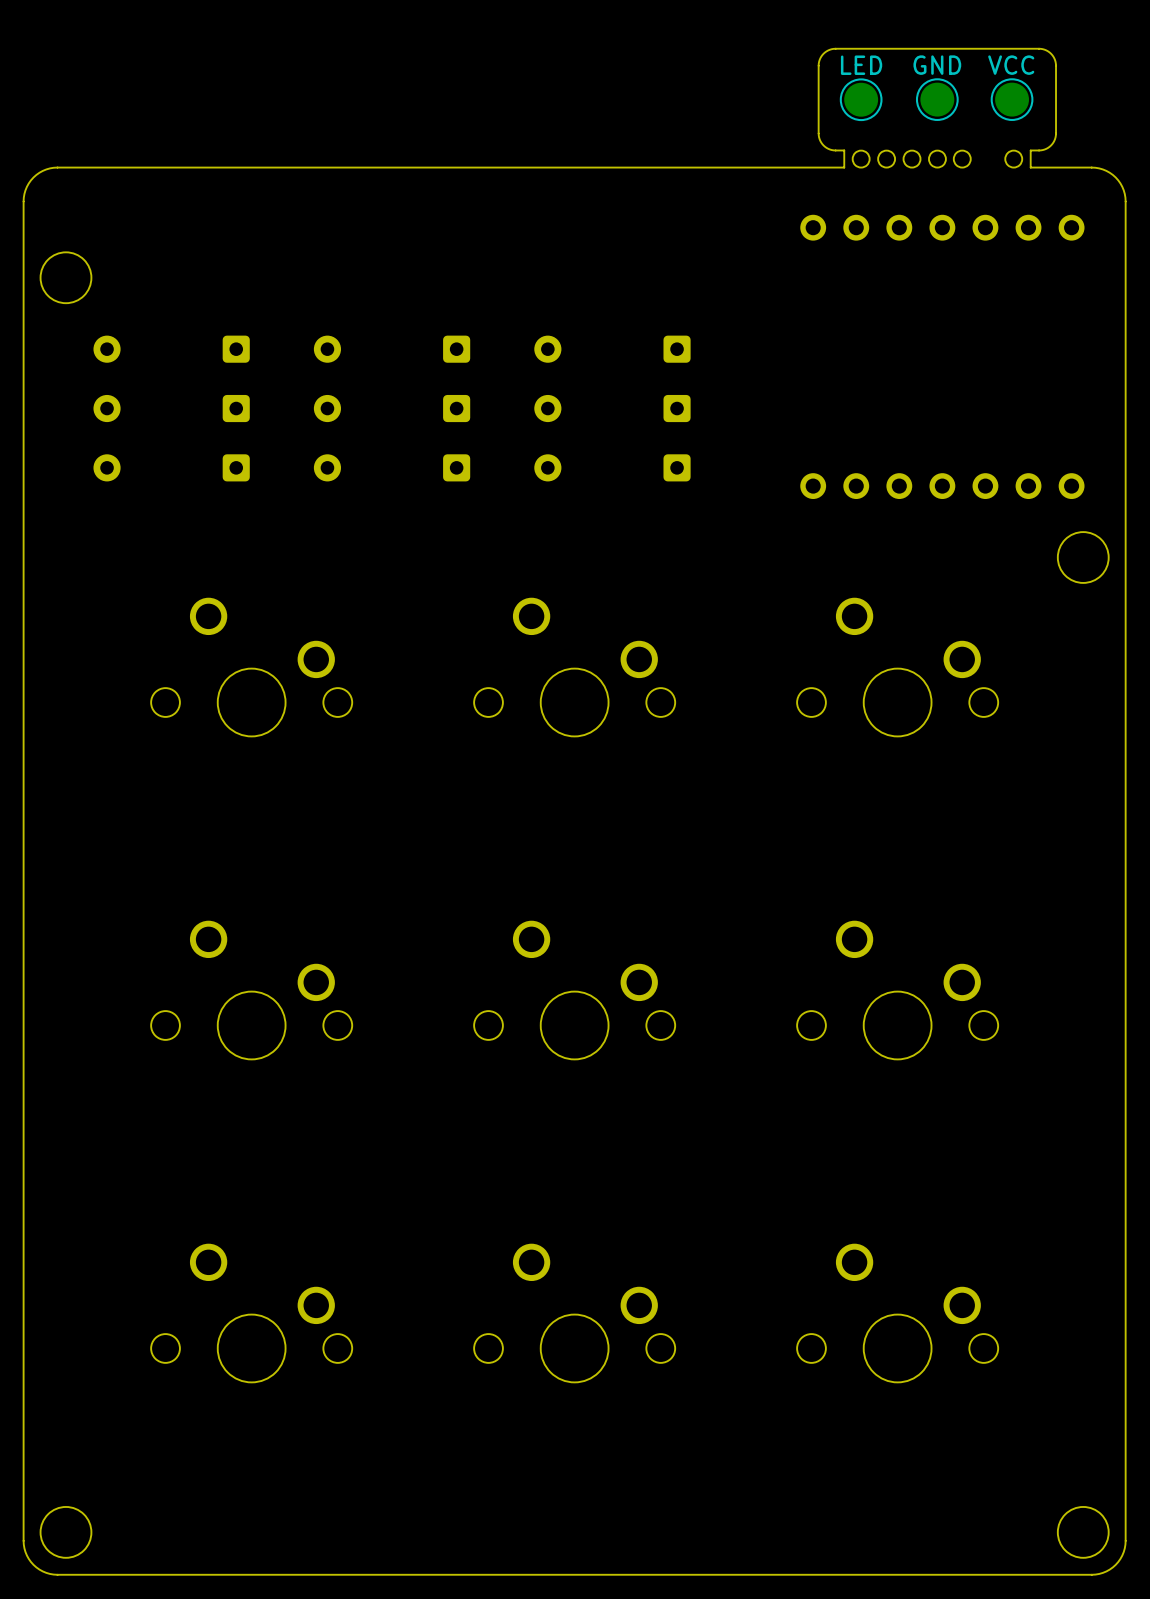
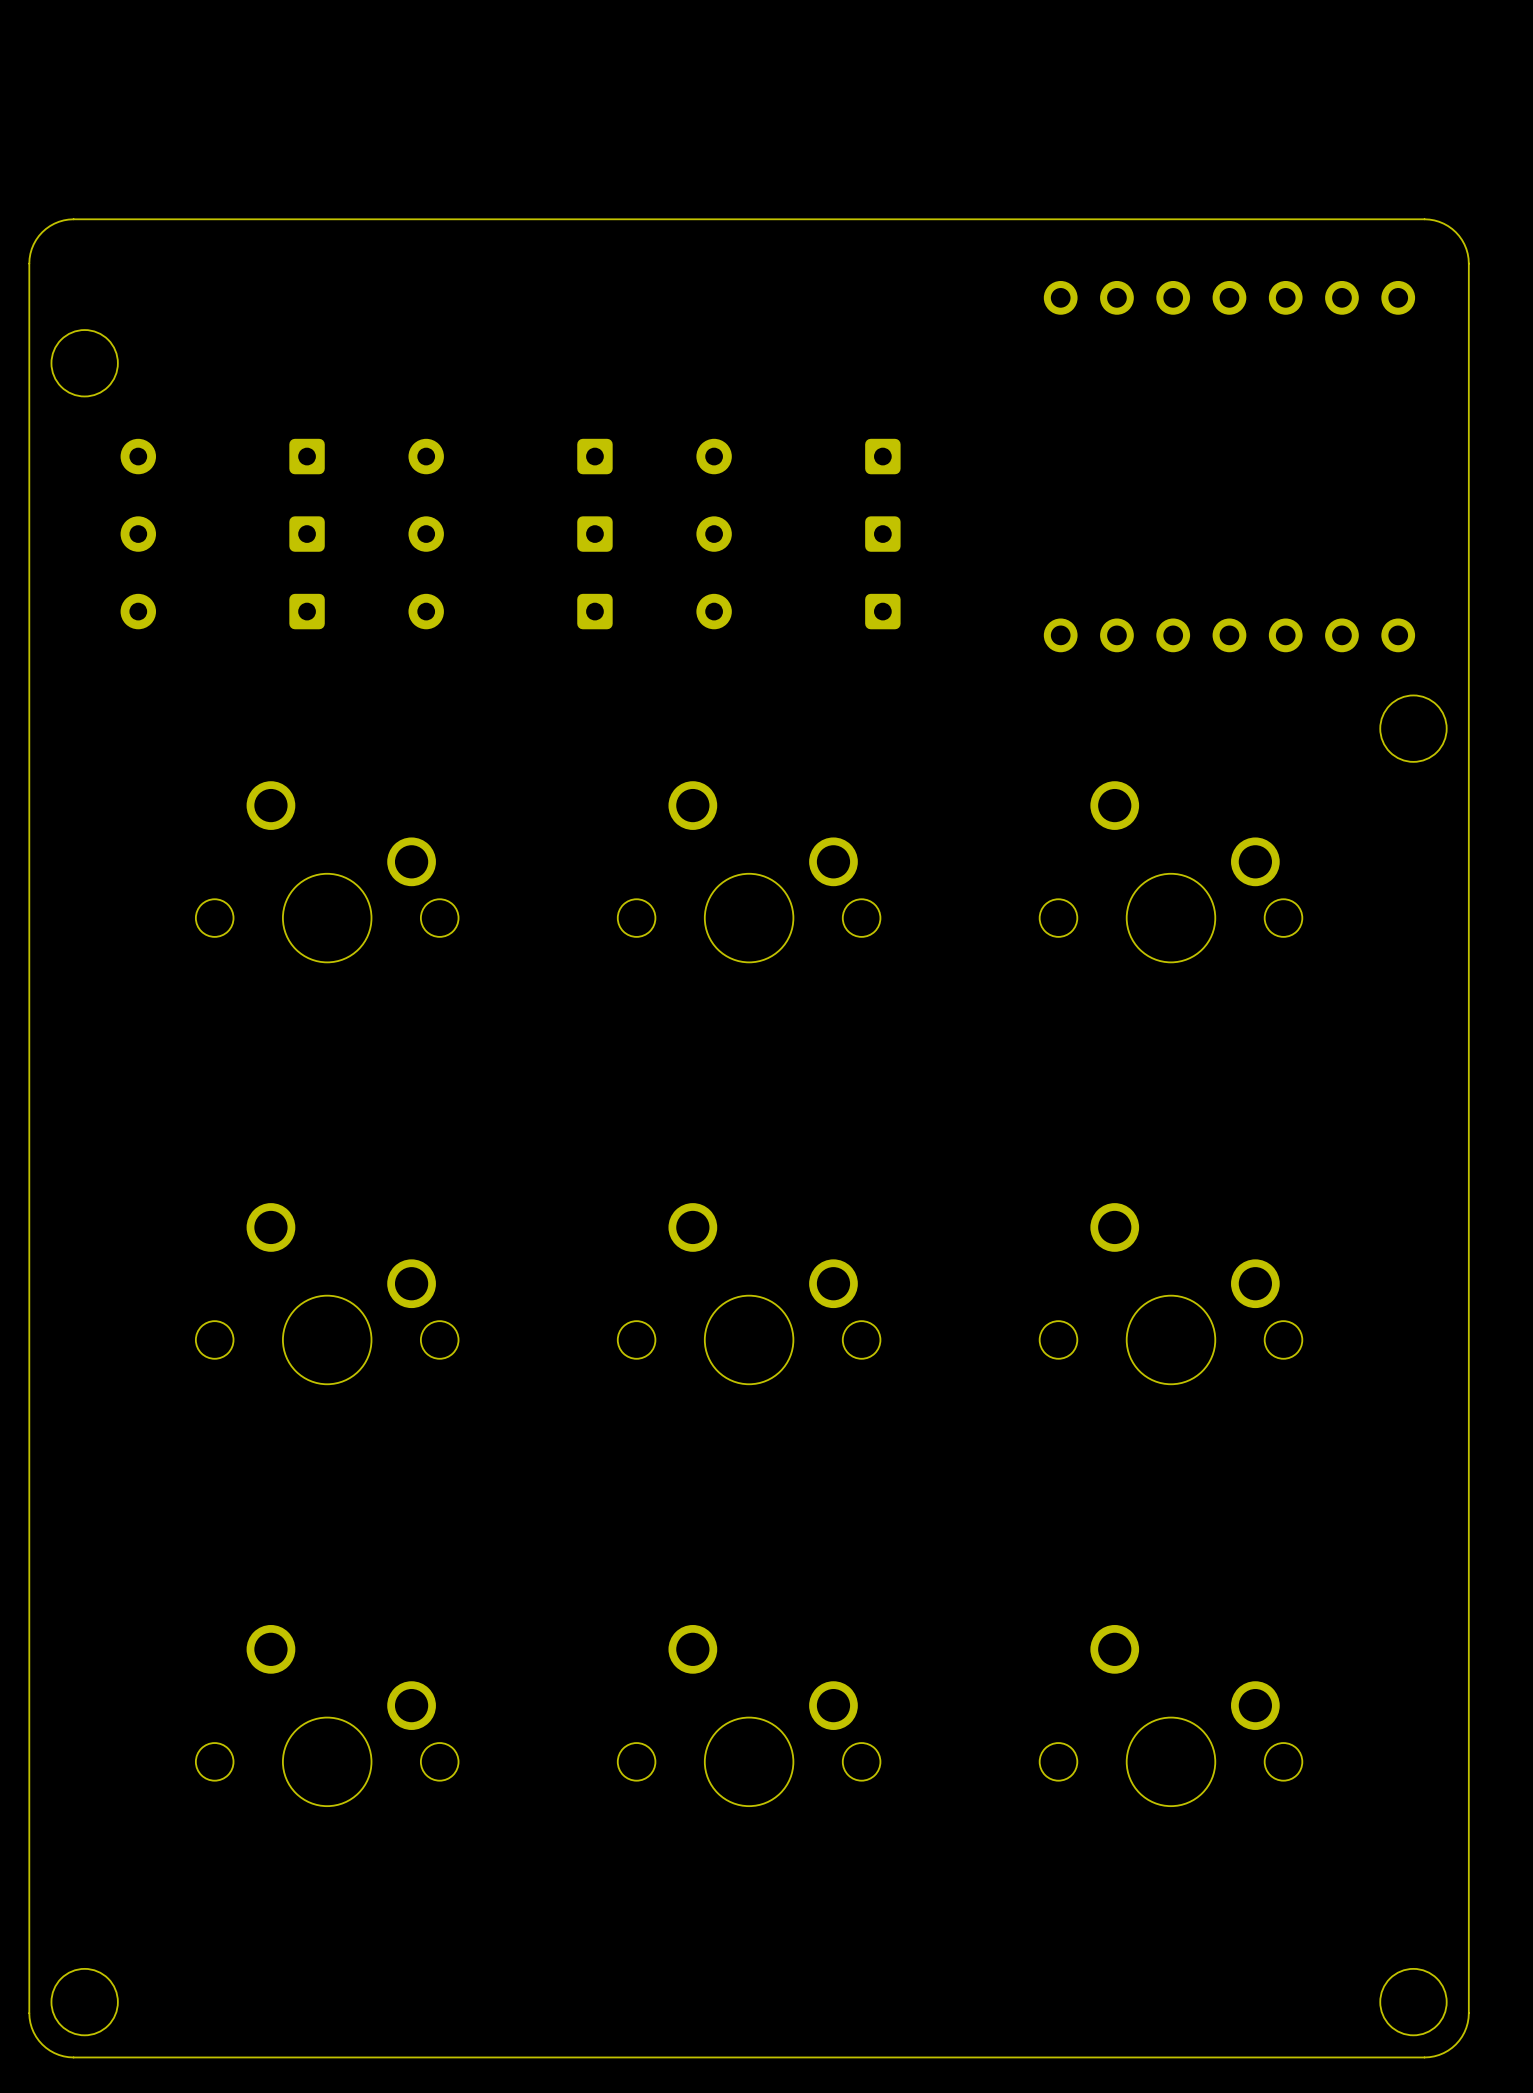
LED: (861, 99) -> none
GND: (937, 99) -> none
VCC: (1012, 99) -> none
board edge: (835, 150) (844, 150) (844, 167) -> none
round board edge: [852, 150, 871, 168] -> none
round board edge: [877, 150, 896, 168] -> none
round board edge: [903, 150, 921, 168] -> none
round board edge: [928, 150, 947, 168] -> none
round board edge: [953, 150, 972, 168] -> none
round board edge: [1004, 150, 1023, 168] -> none
board edge: (1030, 150) (1030, 167) -> (1101, 219) (1344, 219)
board edge: (1030, 150) (1048, 147) (1053, 142) (1055, 135) (1055, 61) (1051, 53) (1040, 48) (835, 48) (828, 50) (822, 55) (818, 63) (818, 135) (825, 146) (835, 150) -> none

